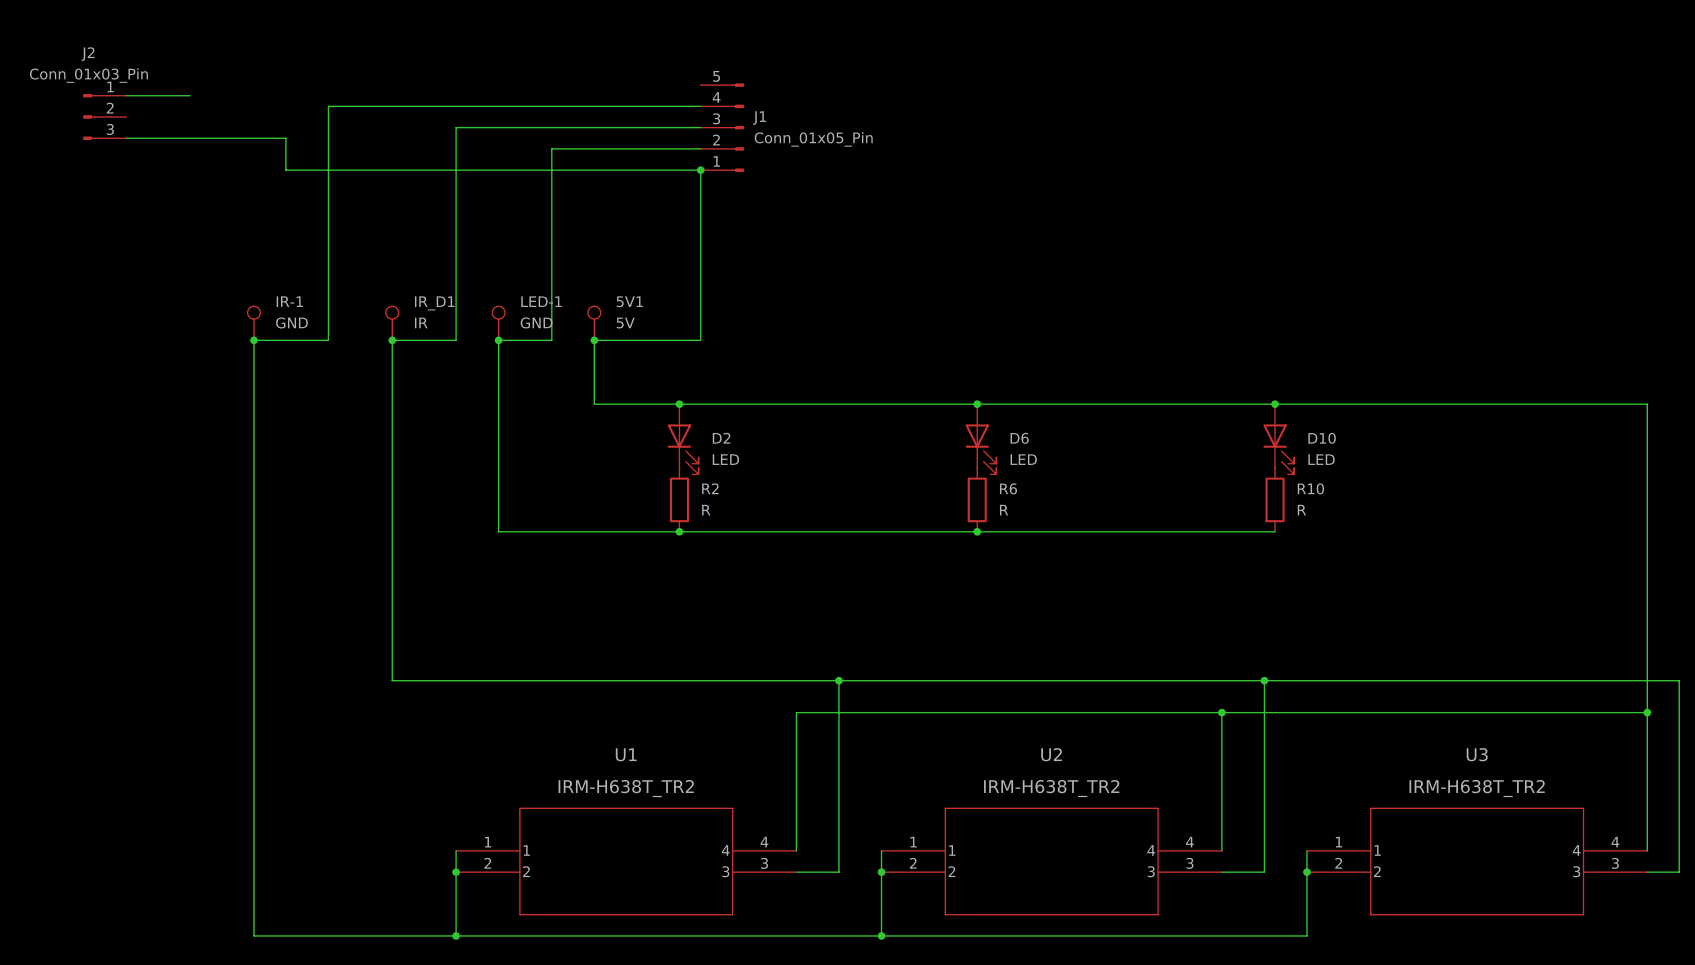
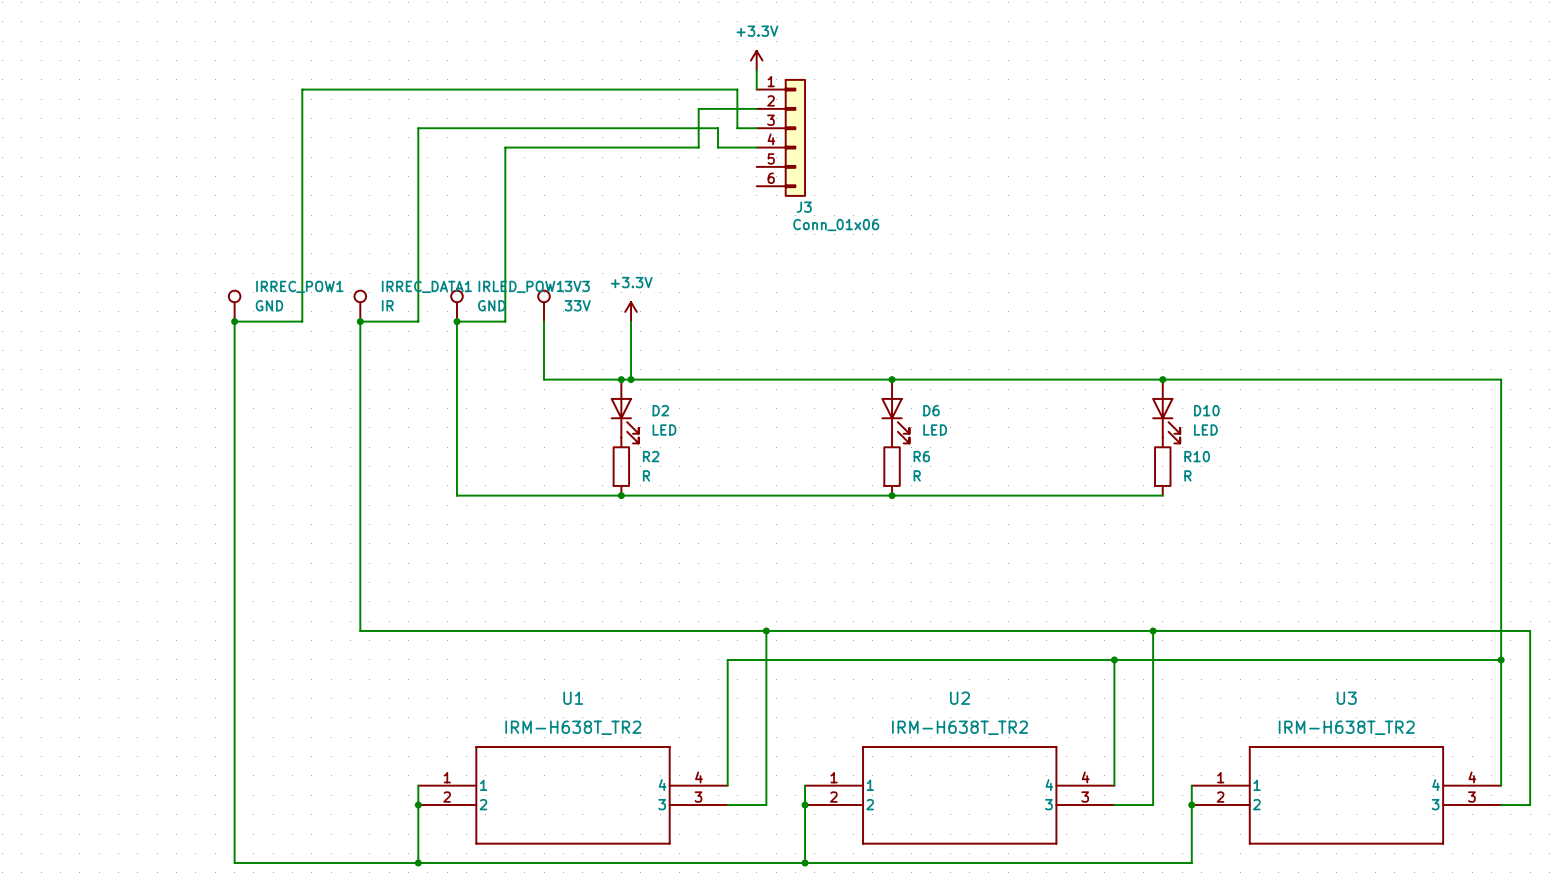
power symbol: none -> +3.3V (756, 60)
wire: none -> (756, 70) (756, 89)
wire: (126, 95) (190, 95) -> none
wire: (328, 106) (700, 106) -> (302, 108) (302, 89) (737, 89) (737, 128) (756, 128)
wire: none -> (756, 108) (698, 108) (698, 147) (640, 147)
J2: Conn_01x03_Pin (104, 117) -> none
wire: none -> (640, 128) (718, 128) (718, 147) (756, 147)
J1: Conn_01x05_Pin (722, 127) -> none
wire: (126, 138) (285, 138) (285, 170) (700, 170) (700, 340) (594, 340) -> none
J3: none -> Conn_01x06 (781, 137)
junction: (700, 170) -> none
IR-1 name: IR-1 (289, 301) -> IRREC_POW1 (299, 286)
LED-1 name: LED-1 (541, 301) -> IRLED_POW1 (521, 286)
5V1 name: 5V1 (629, 301) -> 3V3 (577, 286)
IR_D1 name: IR_D1 (434, 303) -> IRREC_DATA1 (426, 286)
5V1 value: 5V (625, 323) -> 33V (577, 305)
power symbol: none -> +3.3V (631, 311)
junction: (594, 340) -> none
wire: none -> (631, 321) (631, 379)
junction: none -> (631, 379)

